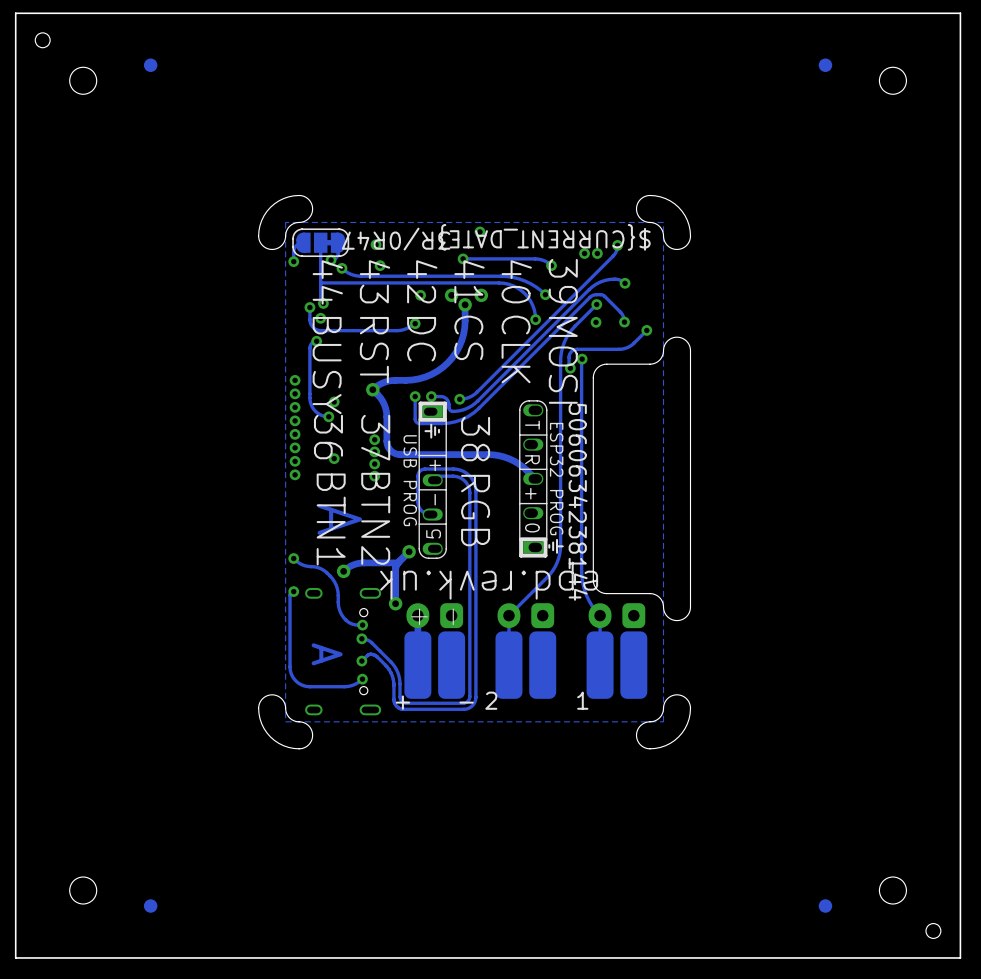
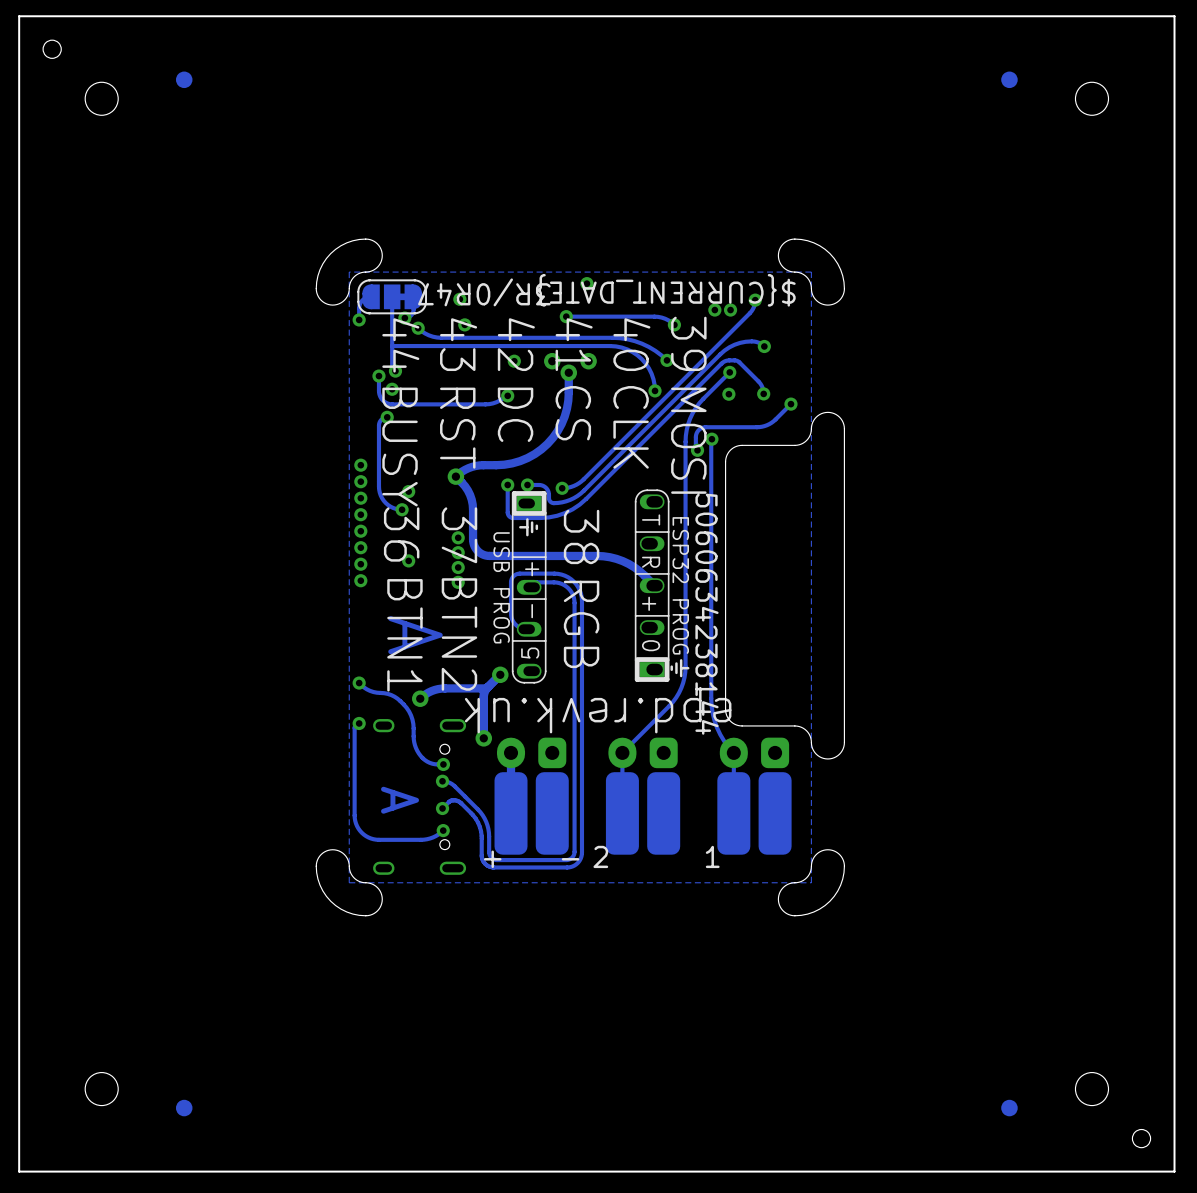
part value: + (419, 616) -> none
part value: - (453, 616) -> none

